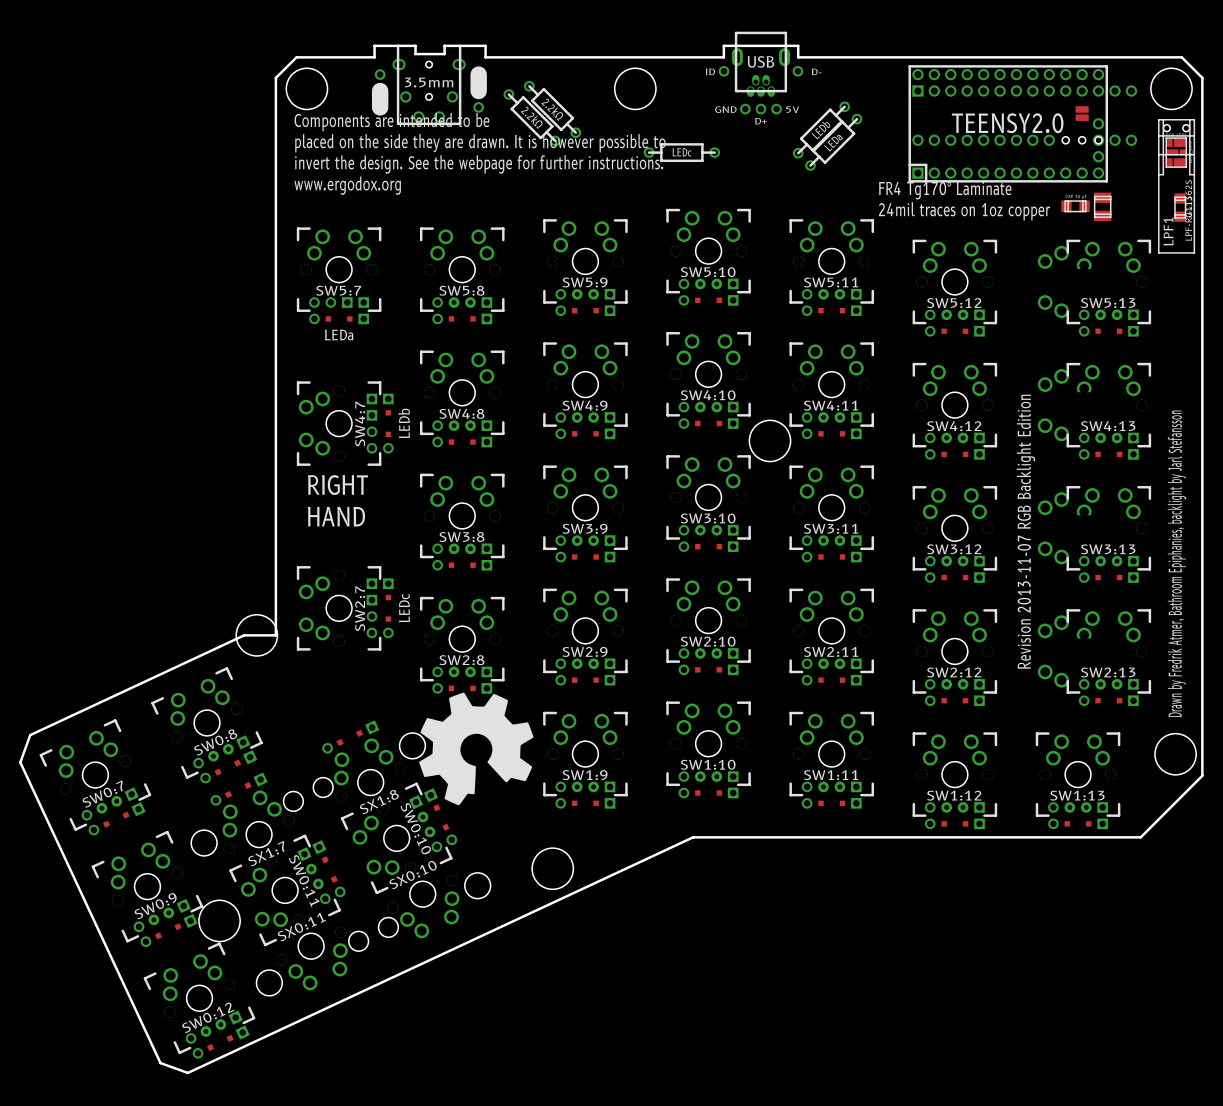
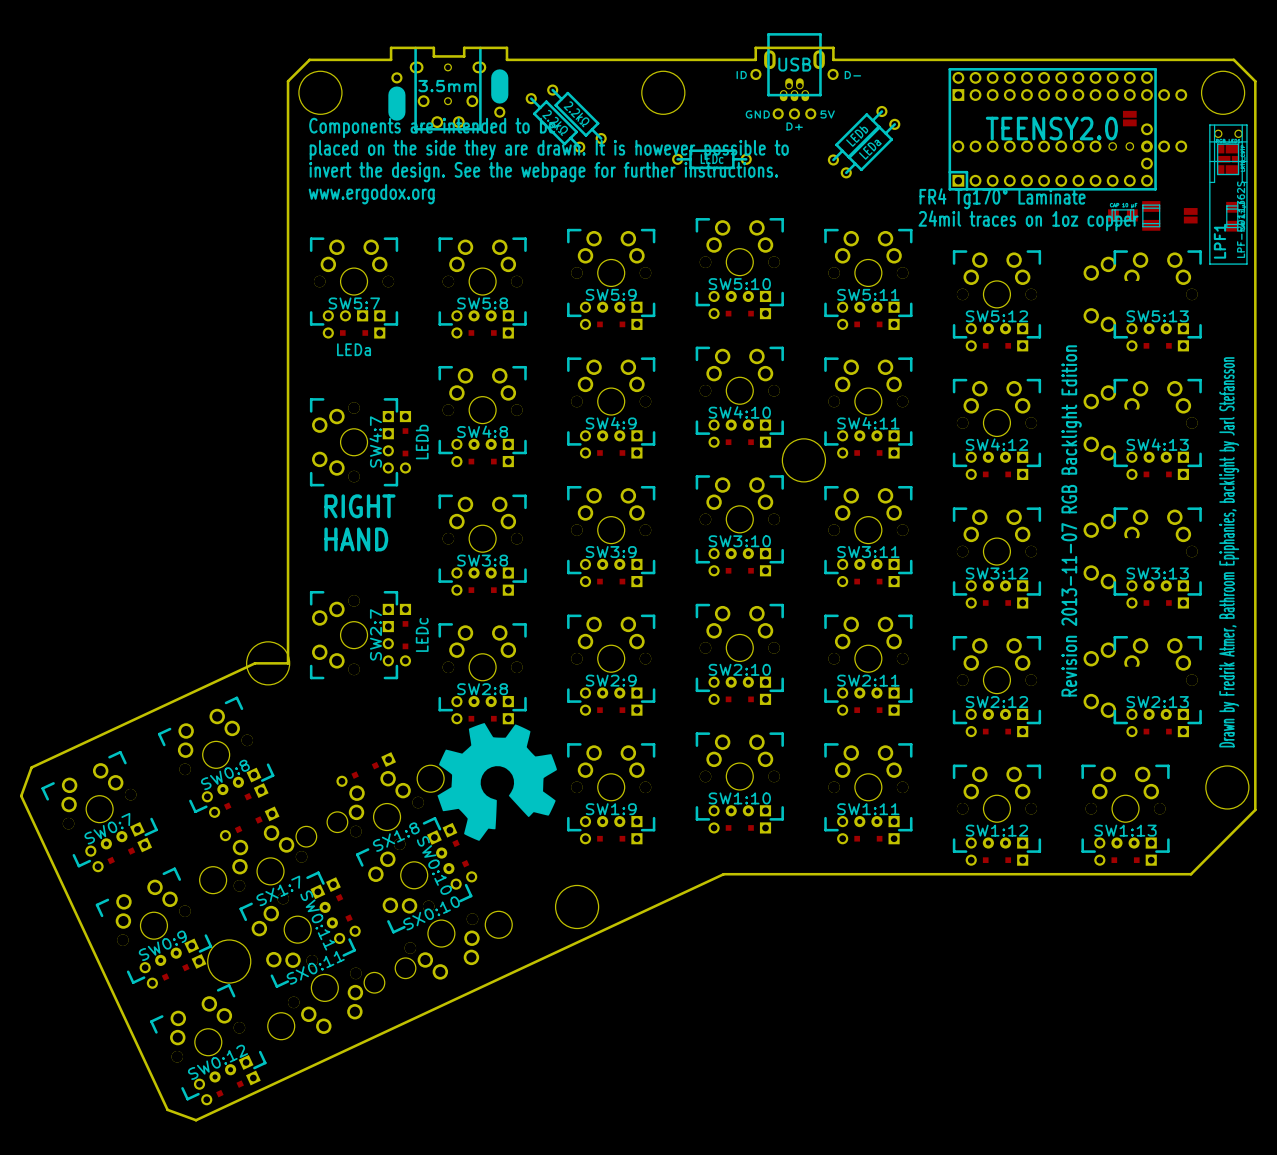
part: none -> (1190, 215)

